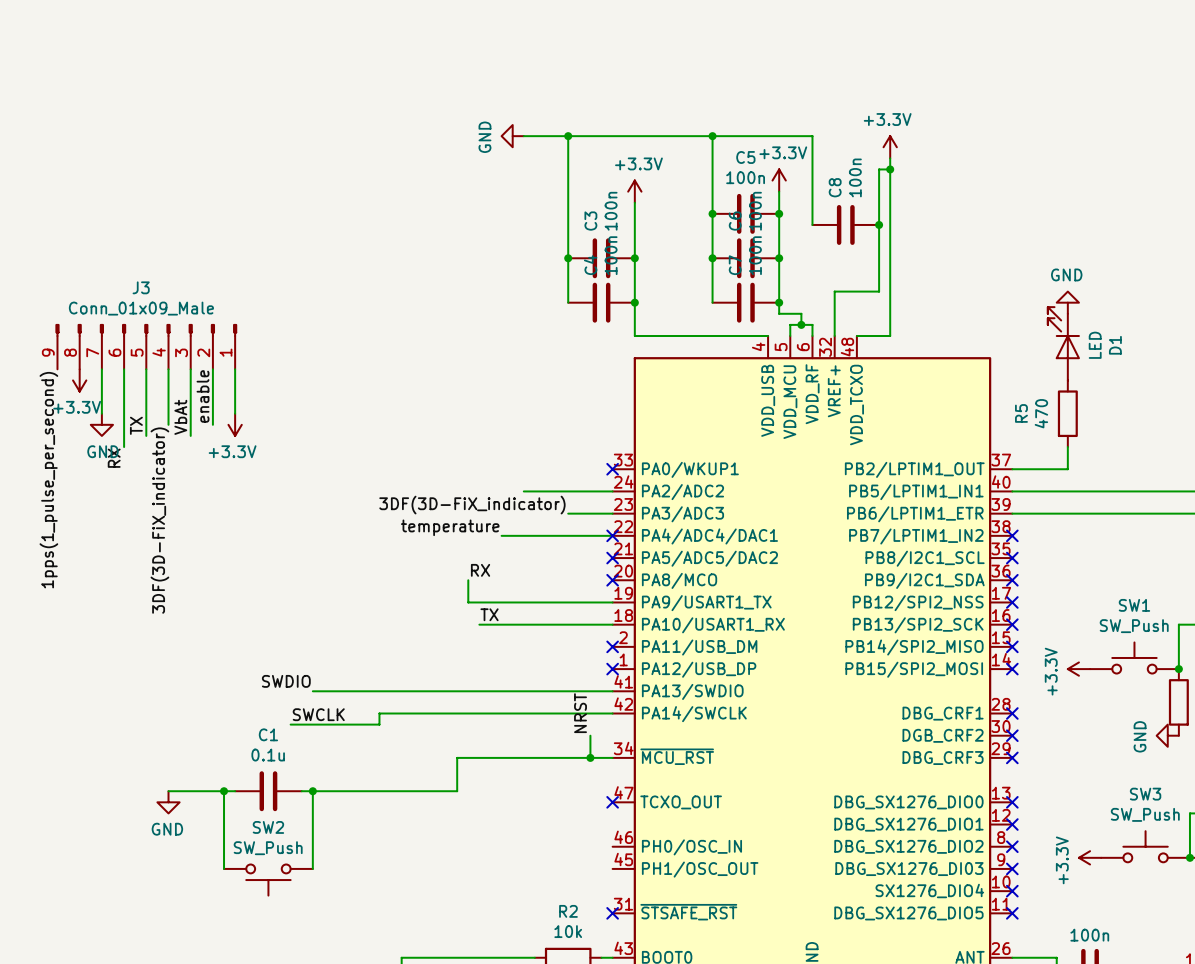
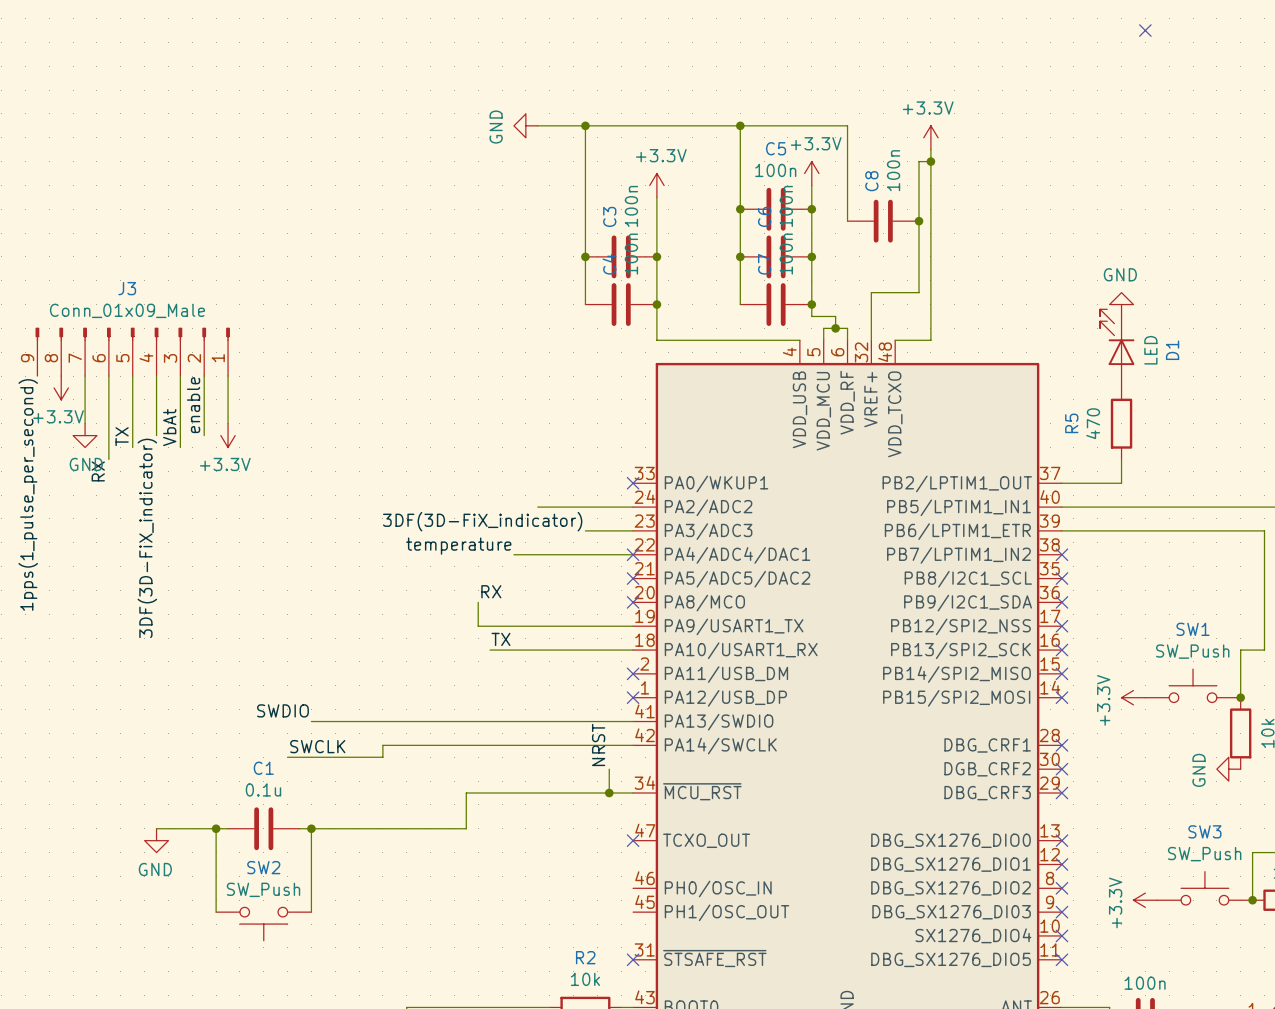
no-connect mark: none -> (1145, 30)

